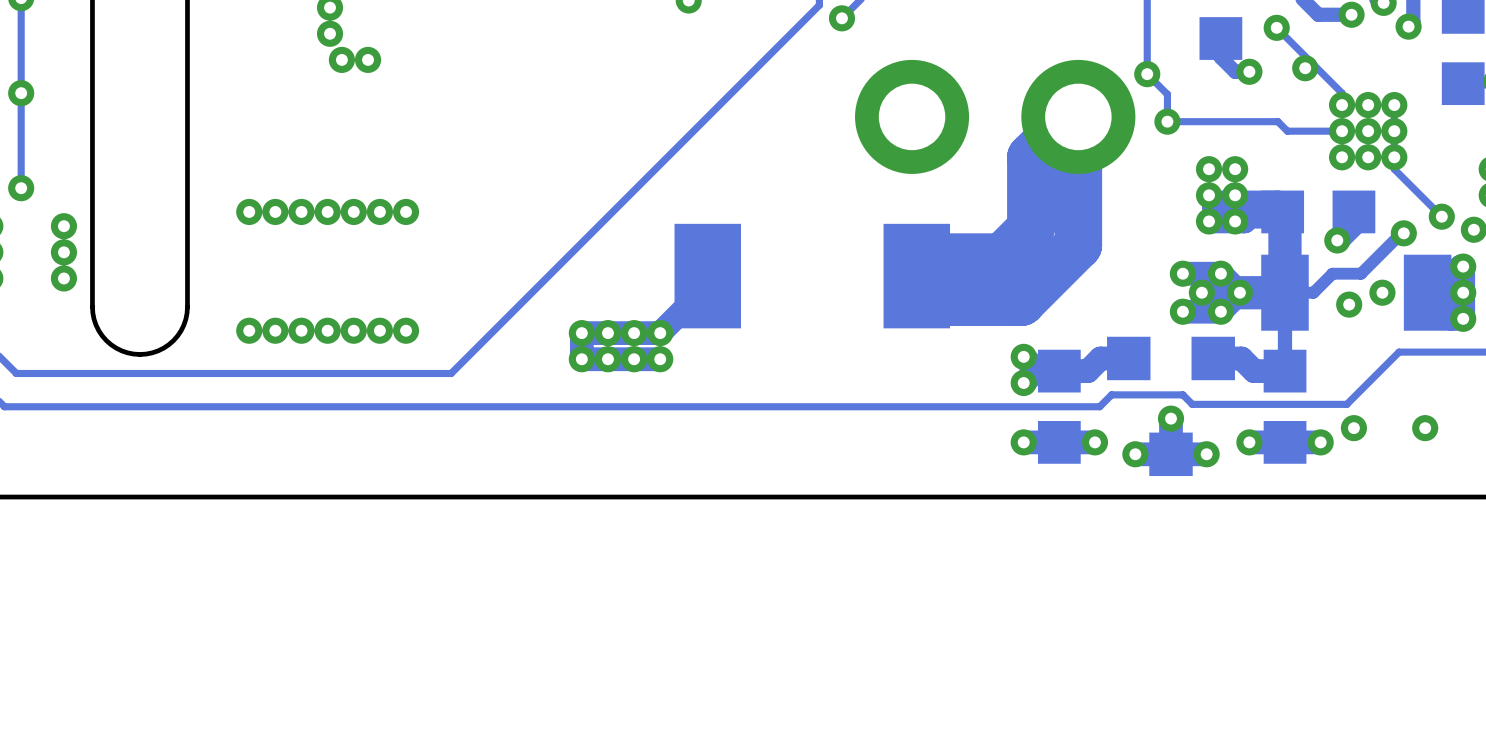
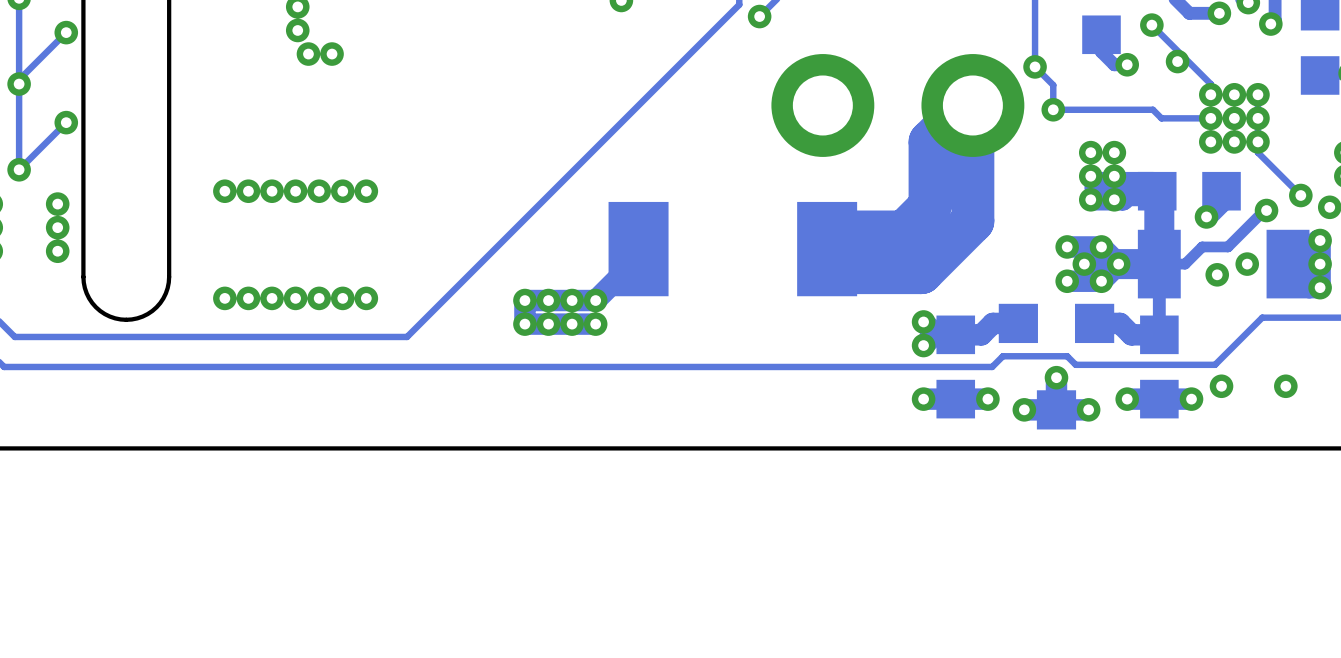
track: none -> (66, 32) (19, 79)
via: none -> (66, 32)
track: none -> (66, 122) (19, 169)
via: none -> (66, 122)

